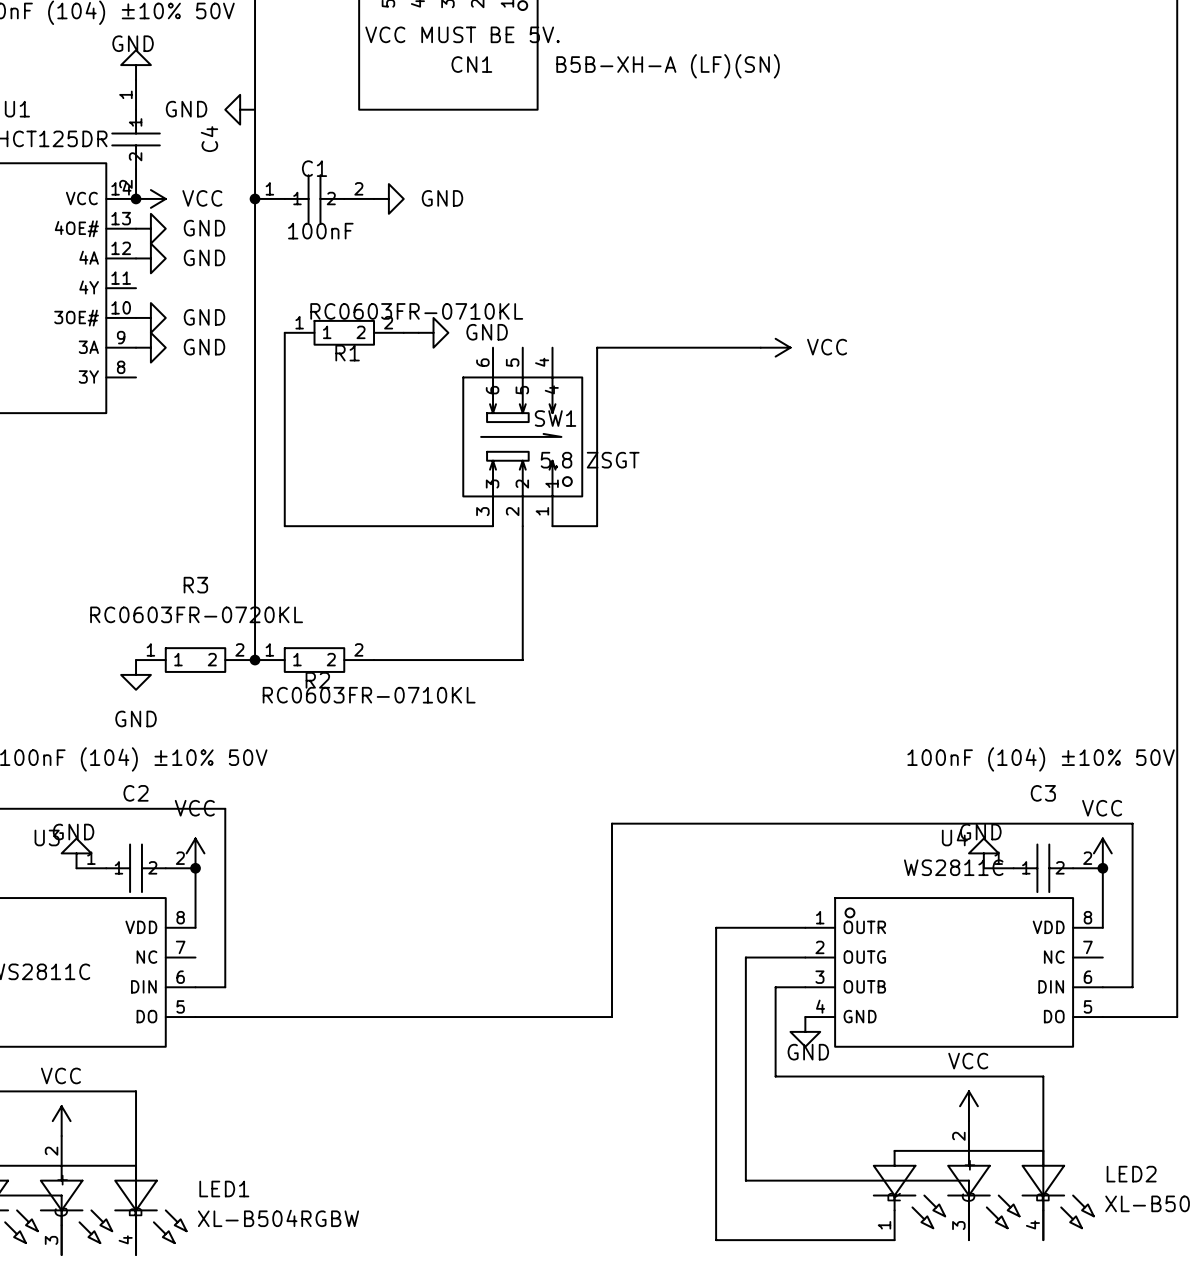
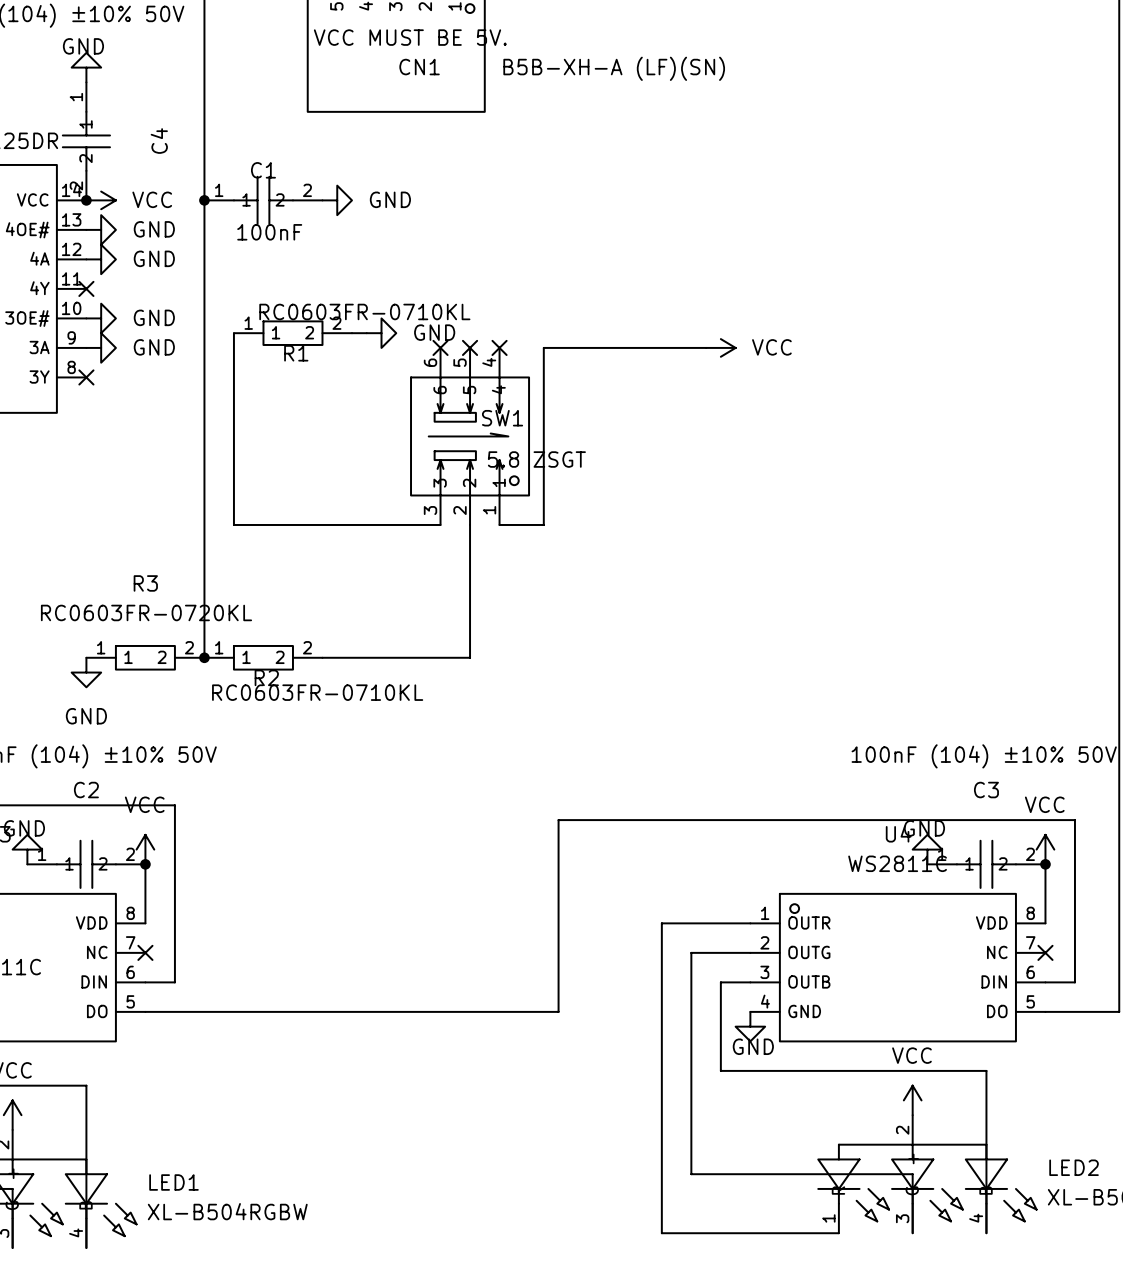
power symbol: GND (240, 109) -> none
no-connect mark: none -> (86, 288)
no-connect mark: none -> (440, 347)
no-connect mark: none -> (470, 347)
no-connect mark: none -> (499, 347)
no-connect mark: none -> (86, 377)
no-connect mark: none -> (145, 952)
no-connect mark: none -> (1045, 952)

